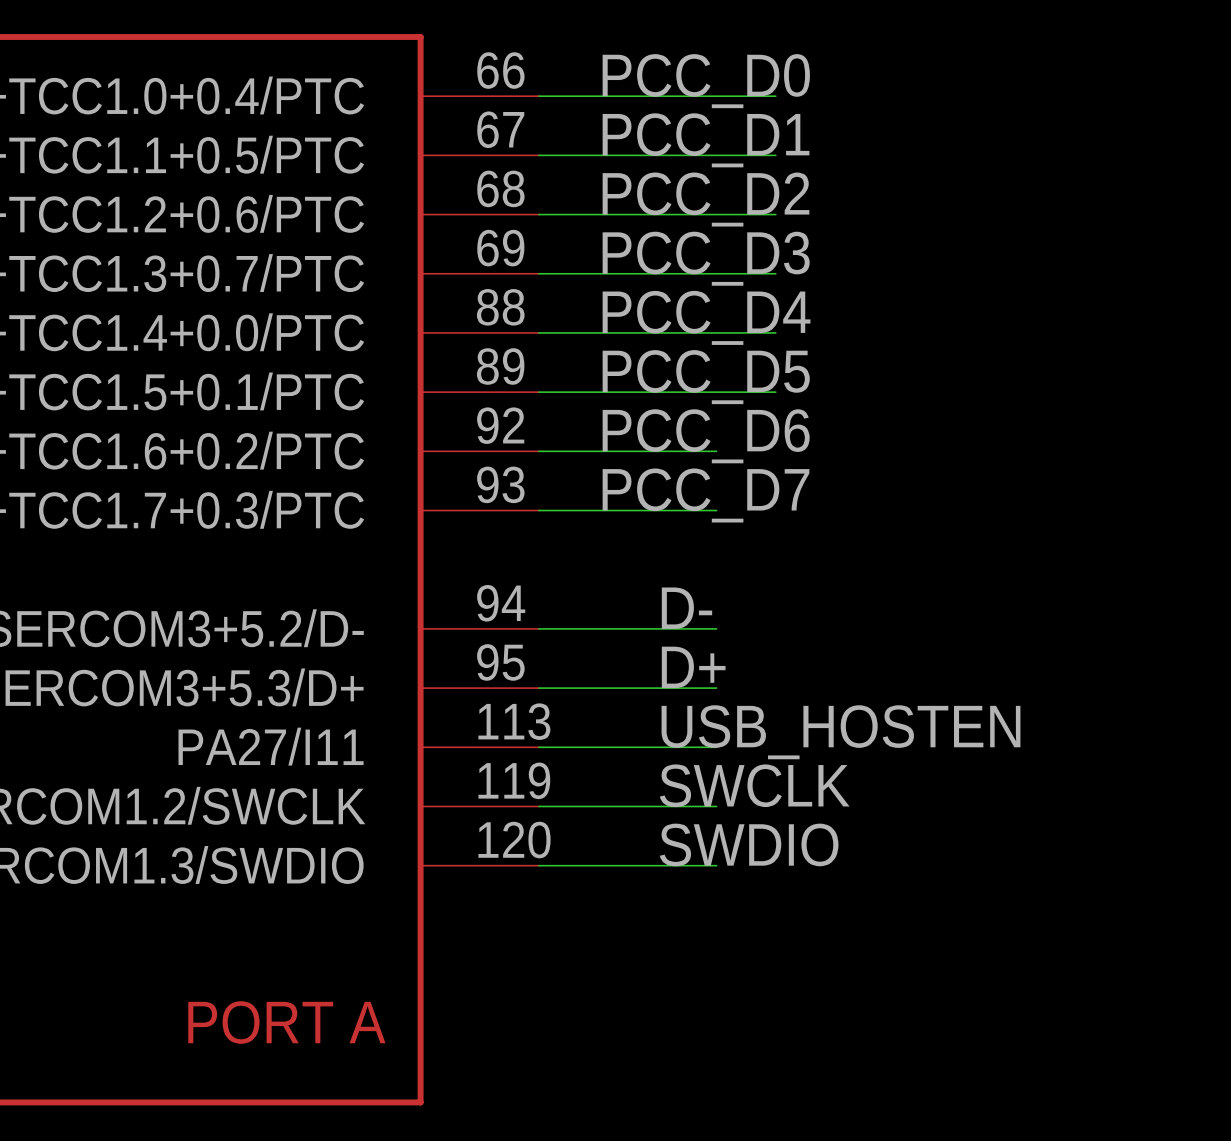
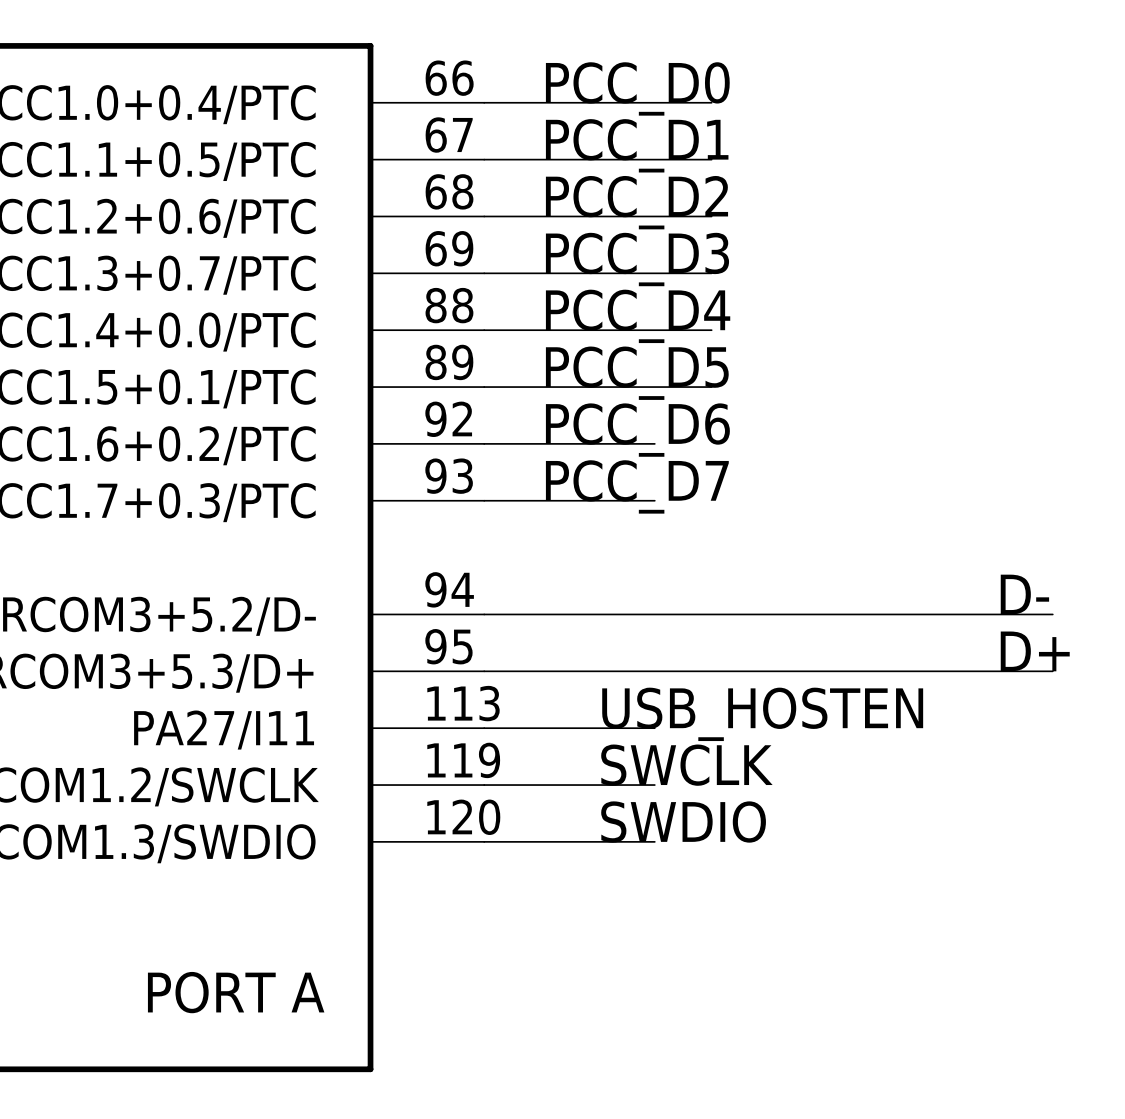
label position: D- (686, 608) -> D- (1024, 594)
wire: none -> (654, 614) (1052, 614)
label position: D+ (693, 667) -> D+ (1035, 651)
wire: none -> (654, 671) (1052, 671)

